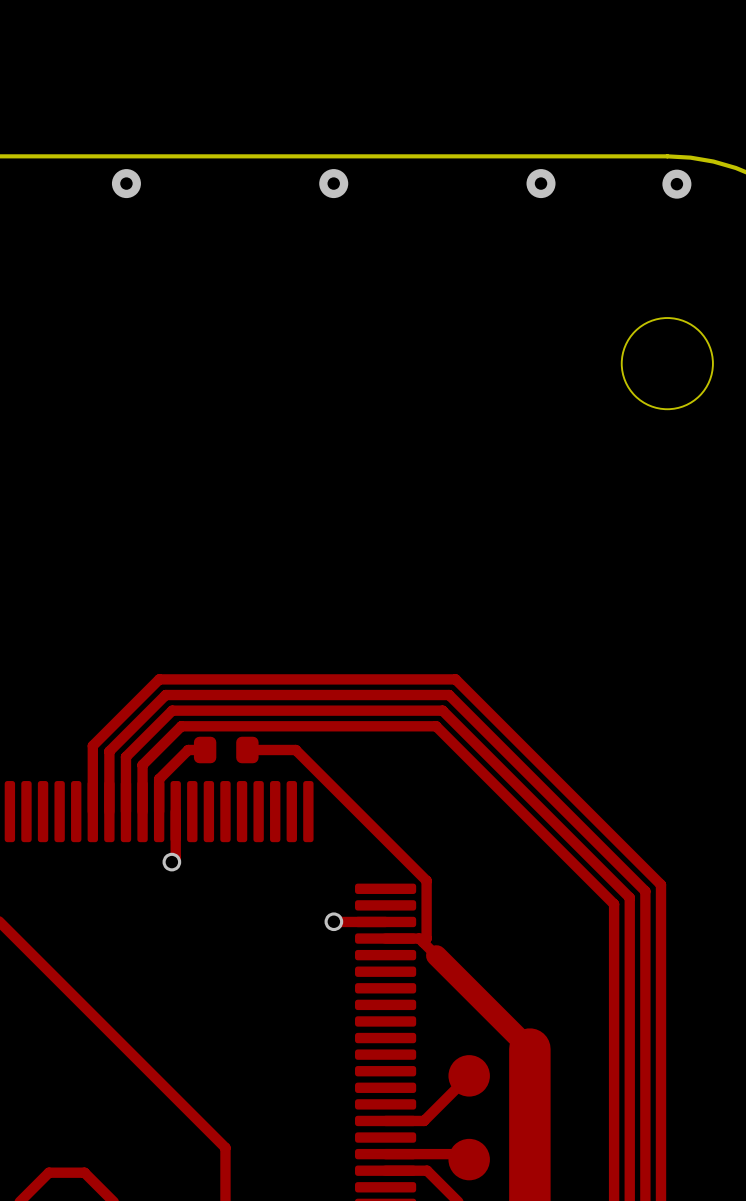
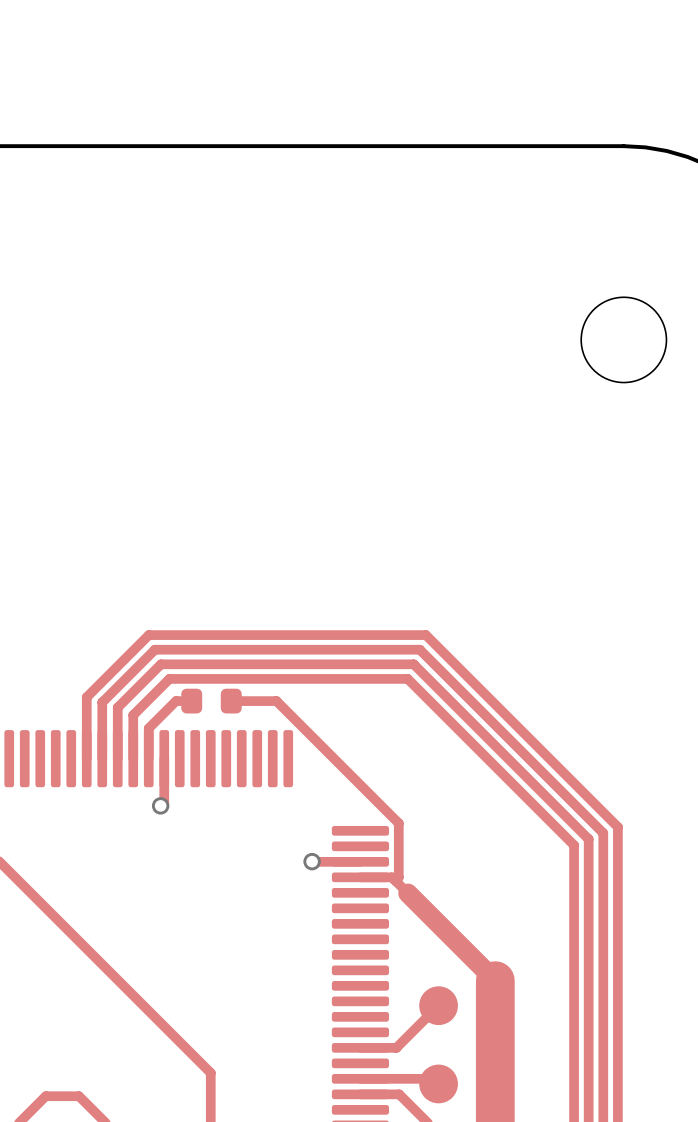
via: (126, 183) -> none
via: (333, 183) -> none
via: (541, 183) -> none
via: (676, 184) -> none

